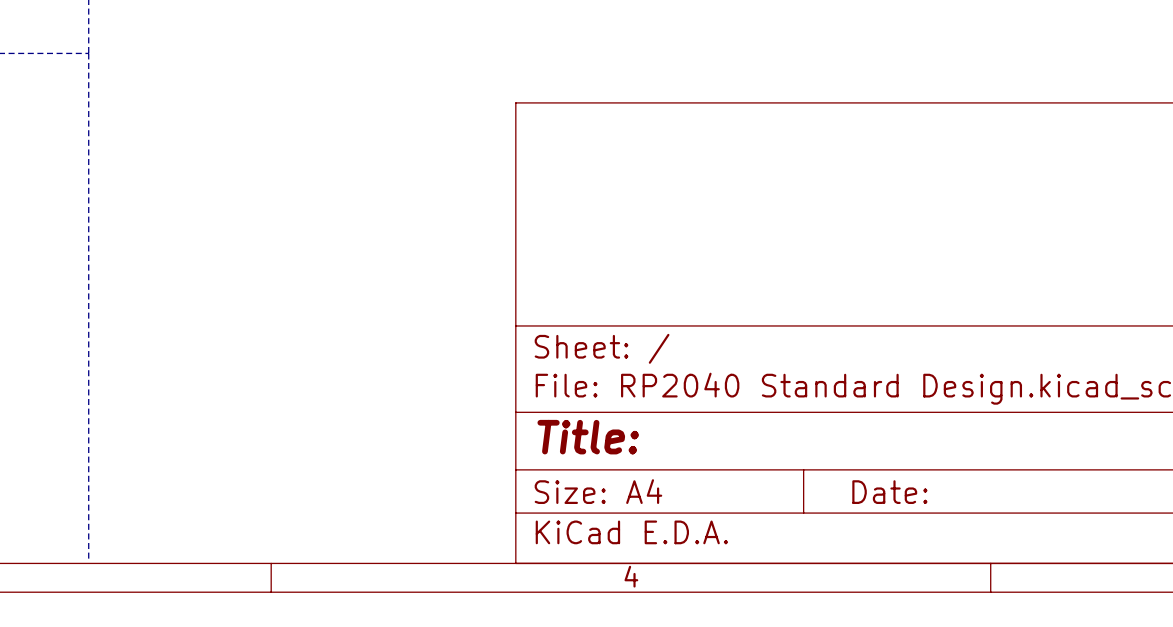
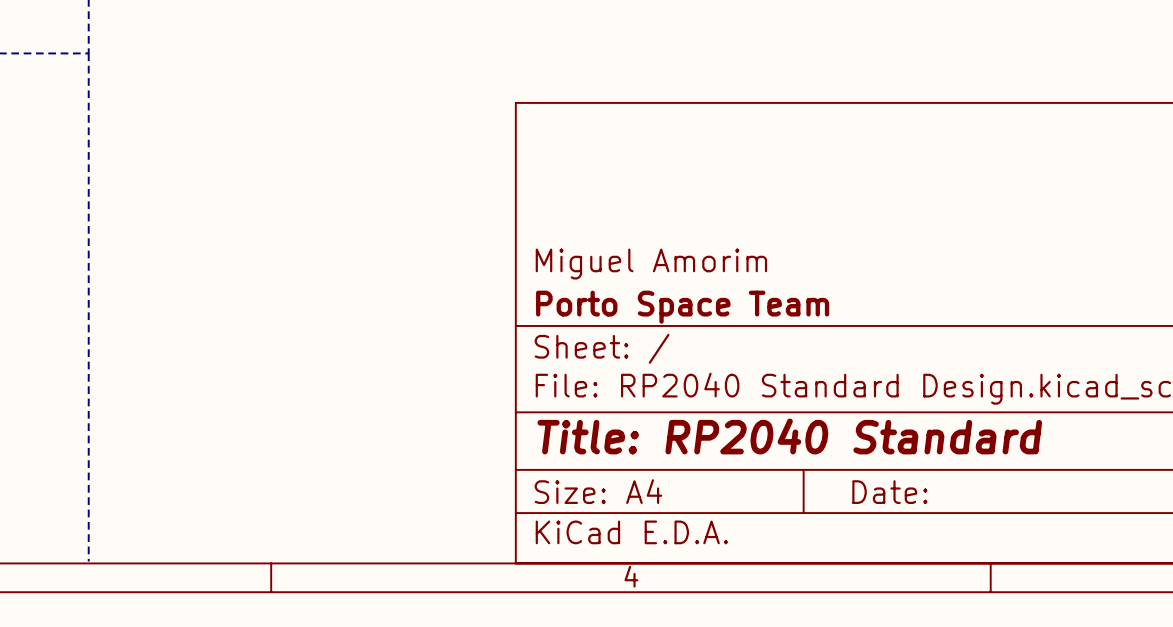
title block: none -> Miguel Amorim (651, 264)
title block: none -> Porto Space Team (682, 307)
title block: Title: (588, 437) -> Title: RP2040 Standard (789, 436)

